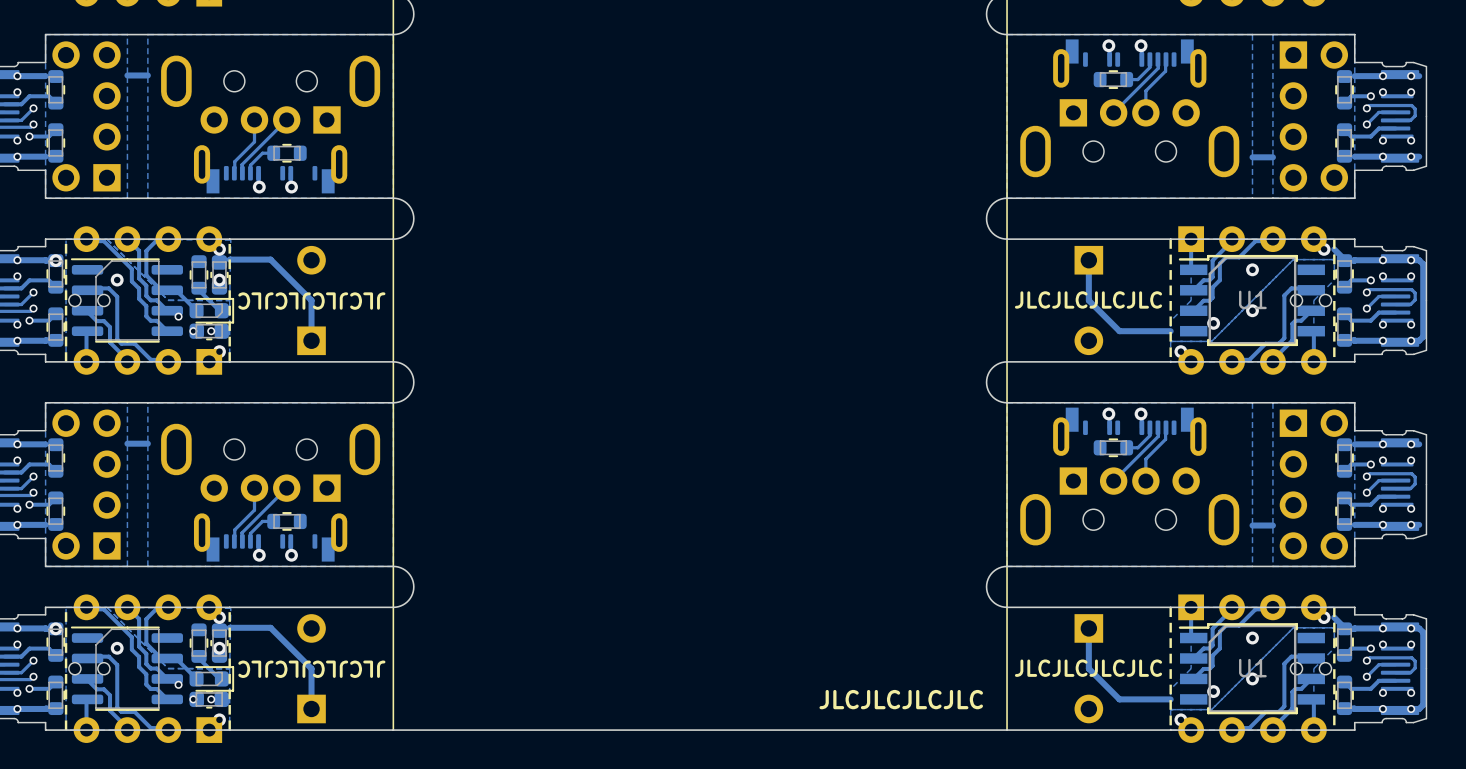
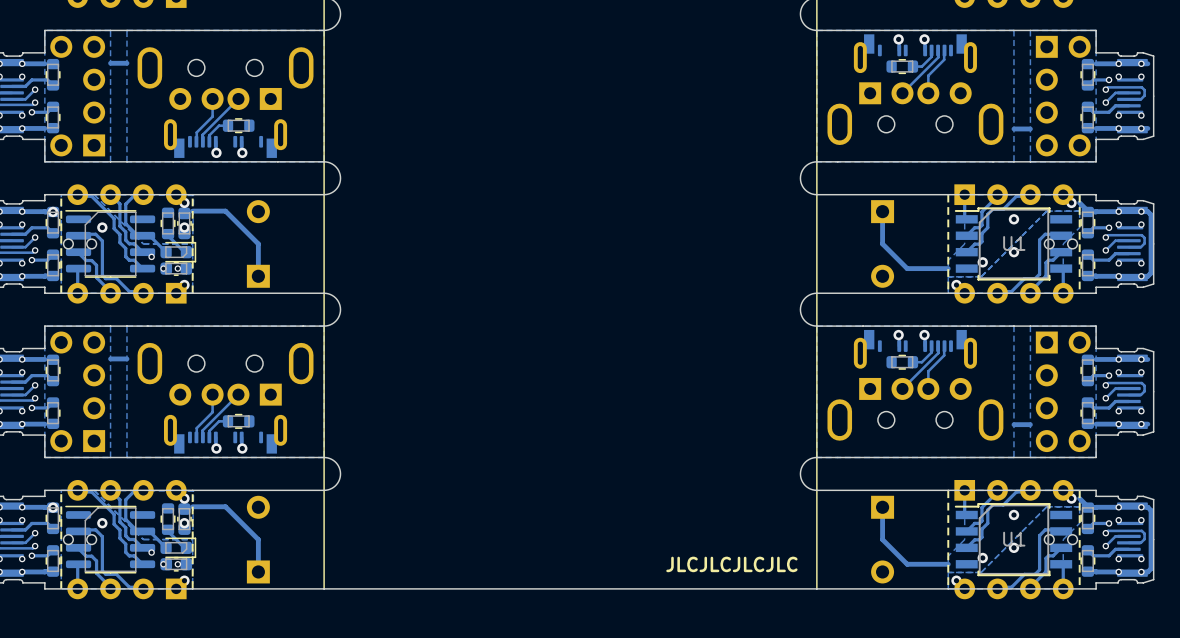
text: JLCJLCJLCJLC (1088, 299) -> none
text: JLCJLCJLCJLC (311, 301) -> none
text: JLCJLCJLCJLC (1088, 668) -> none
text: JLCJLCJLCJLC (311, 669) -> none

